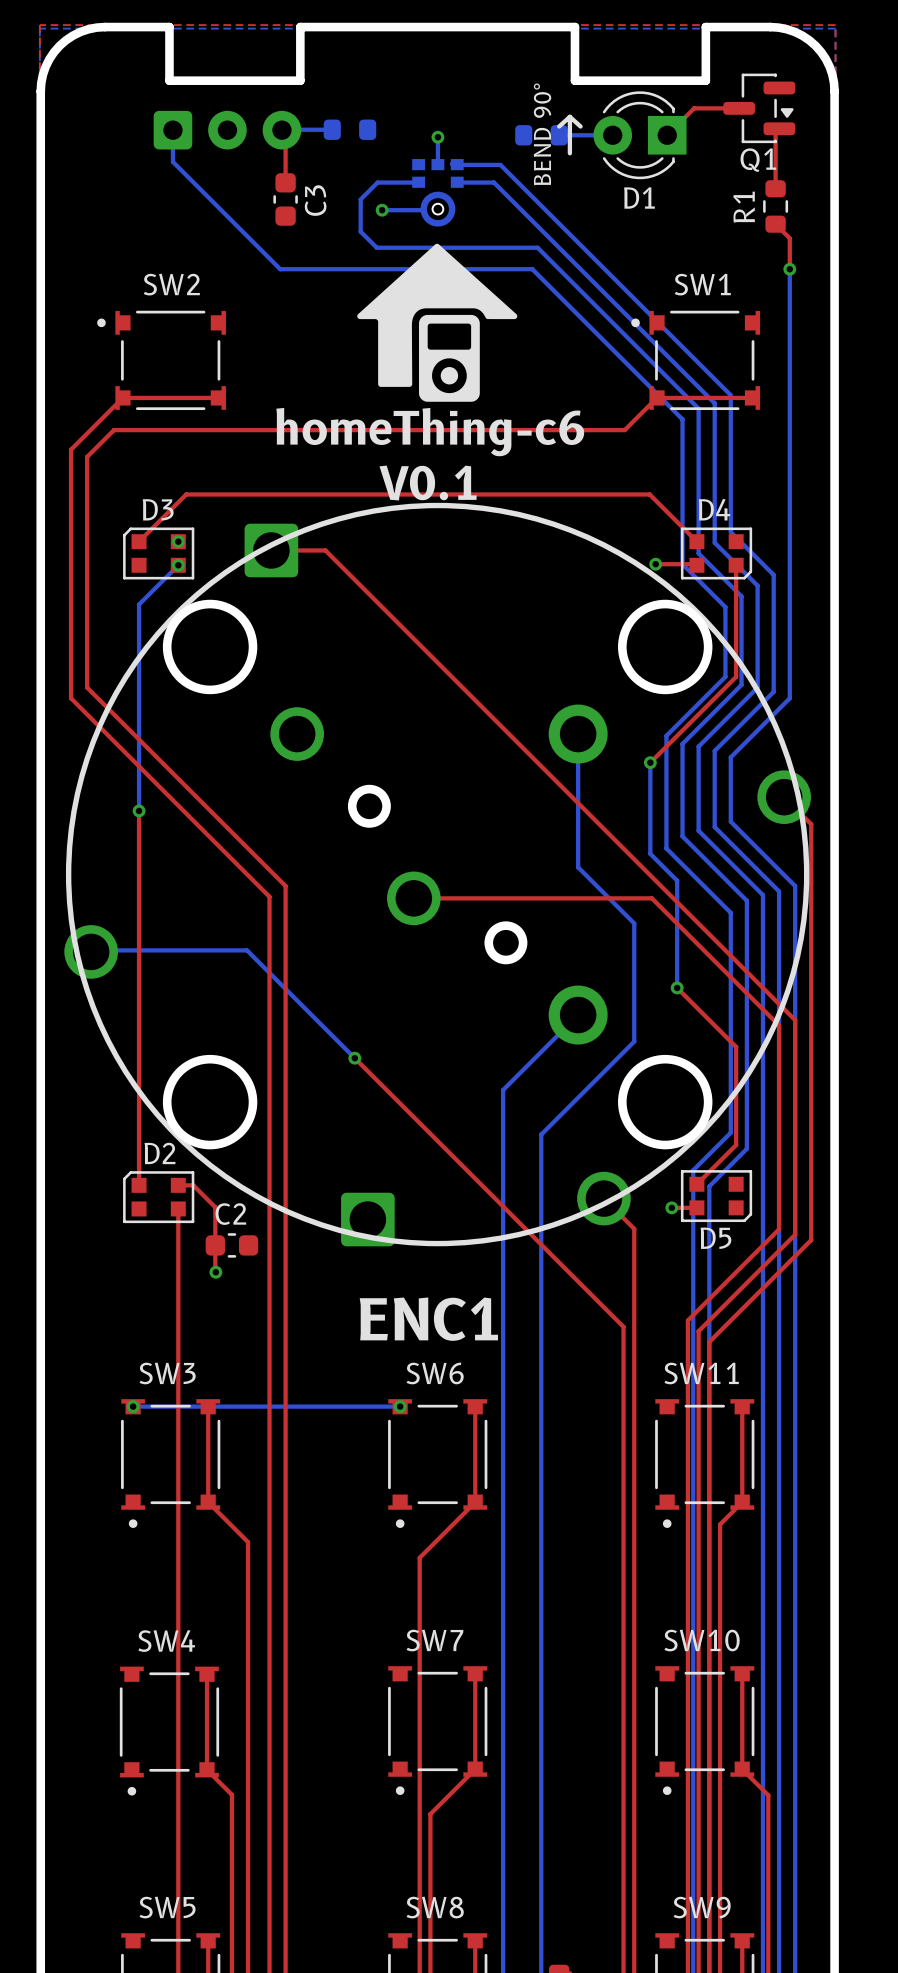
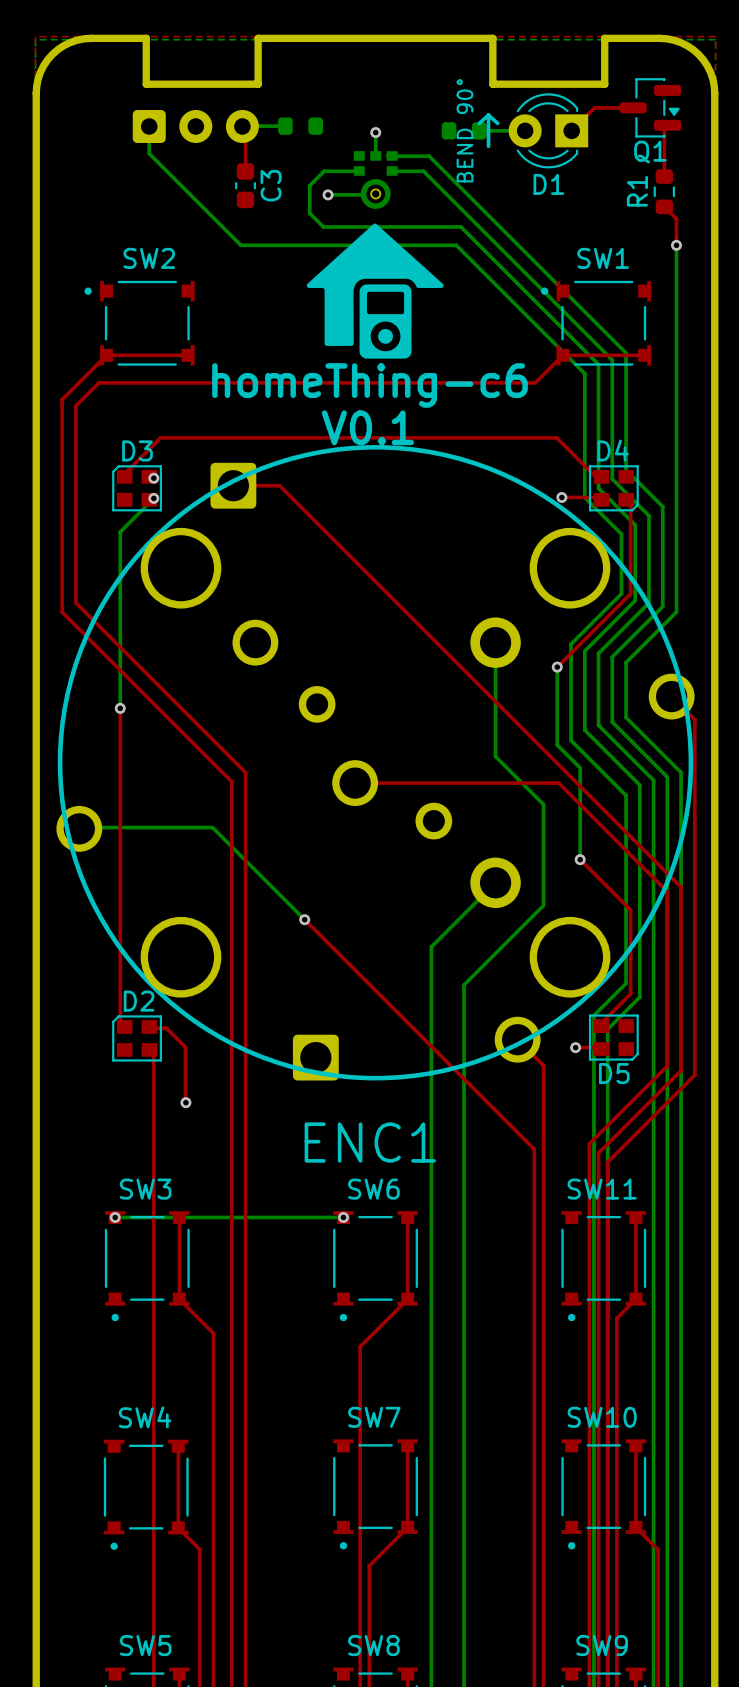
D3 footprint: [123, 527, 195, 580] -> [112, 465, 162, 512]
D4 footprint: [680, 527, 753, 580] -> [588, 465, 639, 512]
D5 footprint: [680, 1170, 753, 1223] -> [588, 1014, 639, 1061]
D2 footprint: [123, 1171, 195, 1224] -> [112, 1015, 162, 1062]
C2: (231, 1245) -> none

